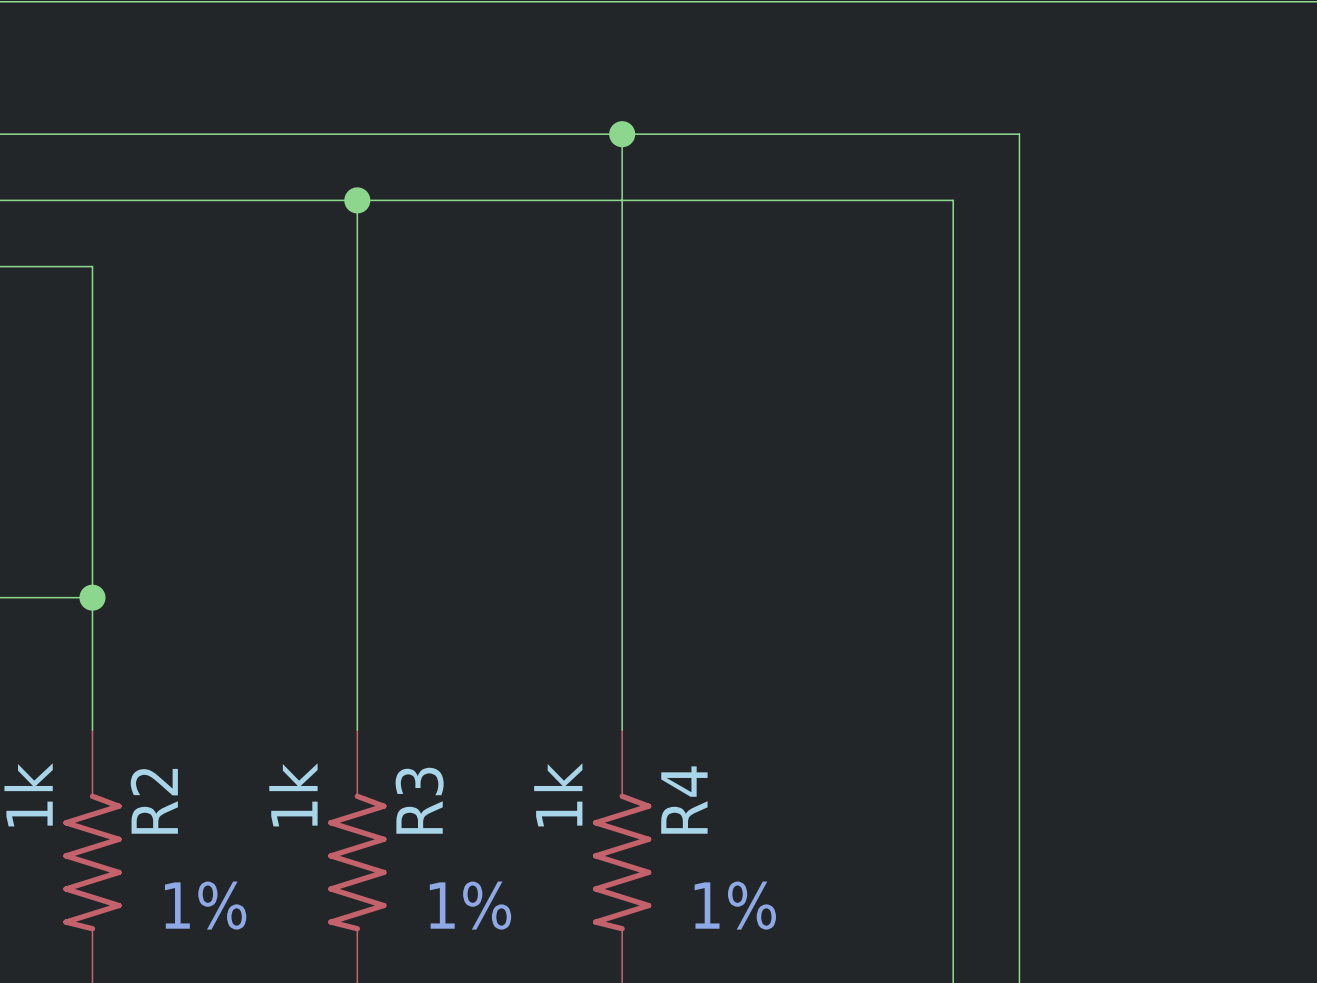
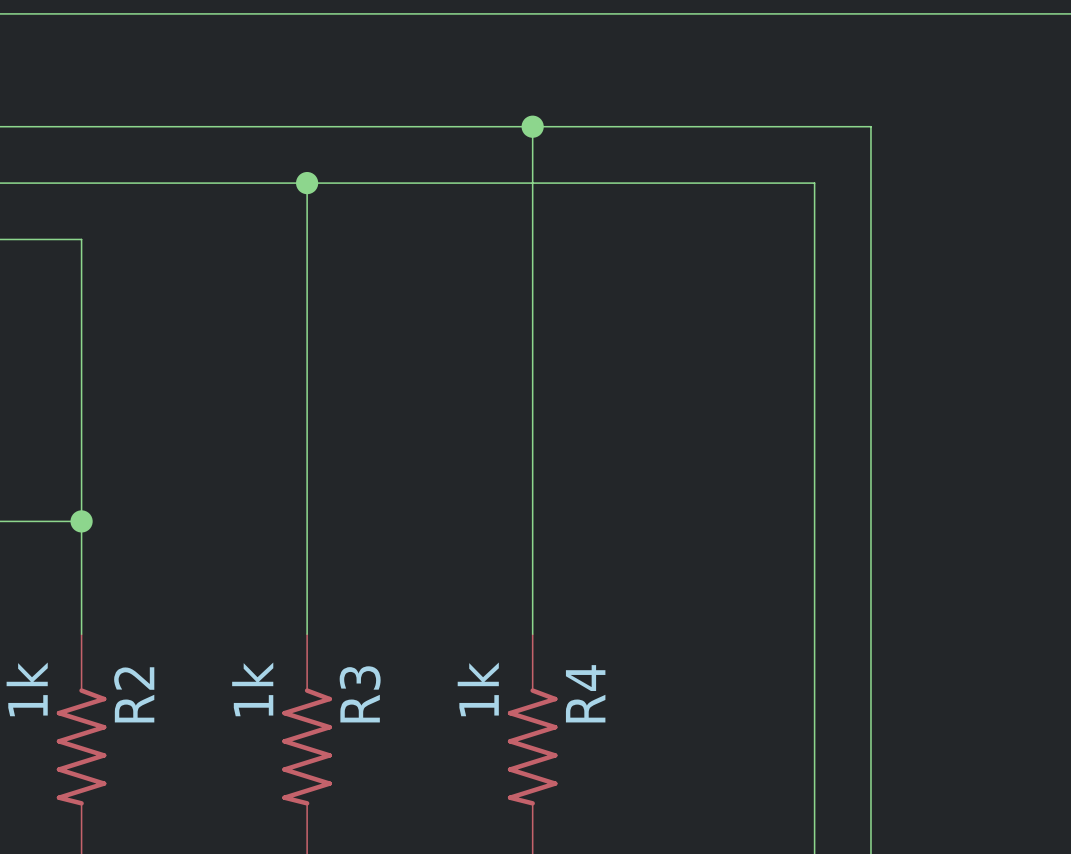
text: 1% (205, 905) -> none
text: 1% (470, 905) -> none
text: 1% (735, 905) -> none

